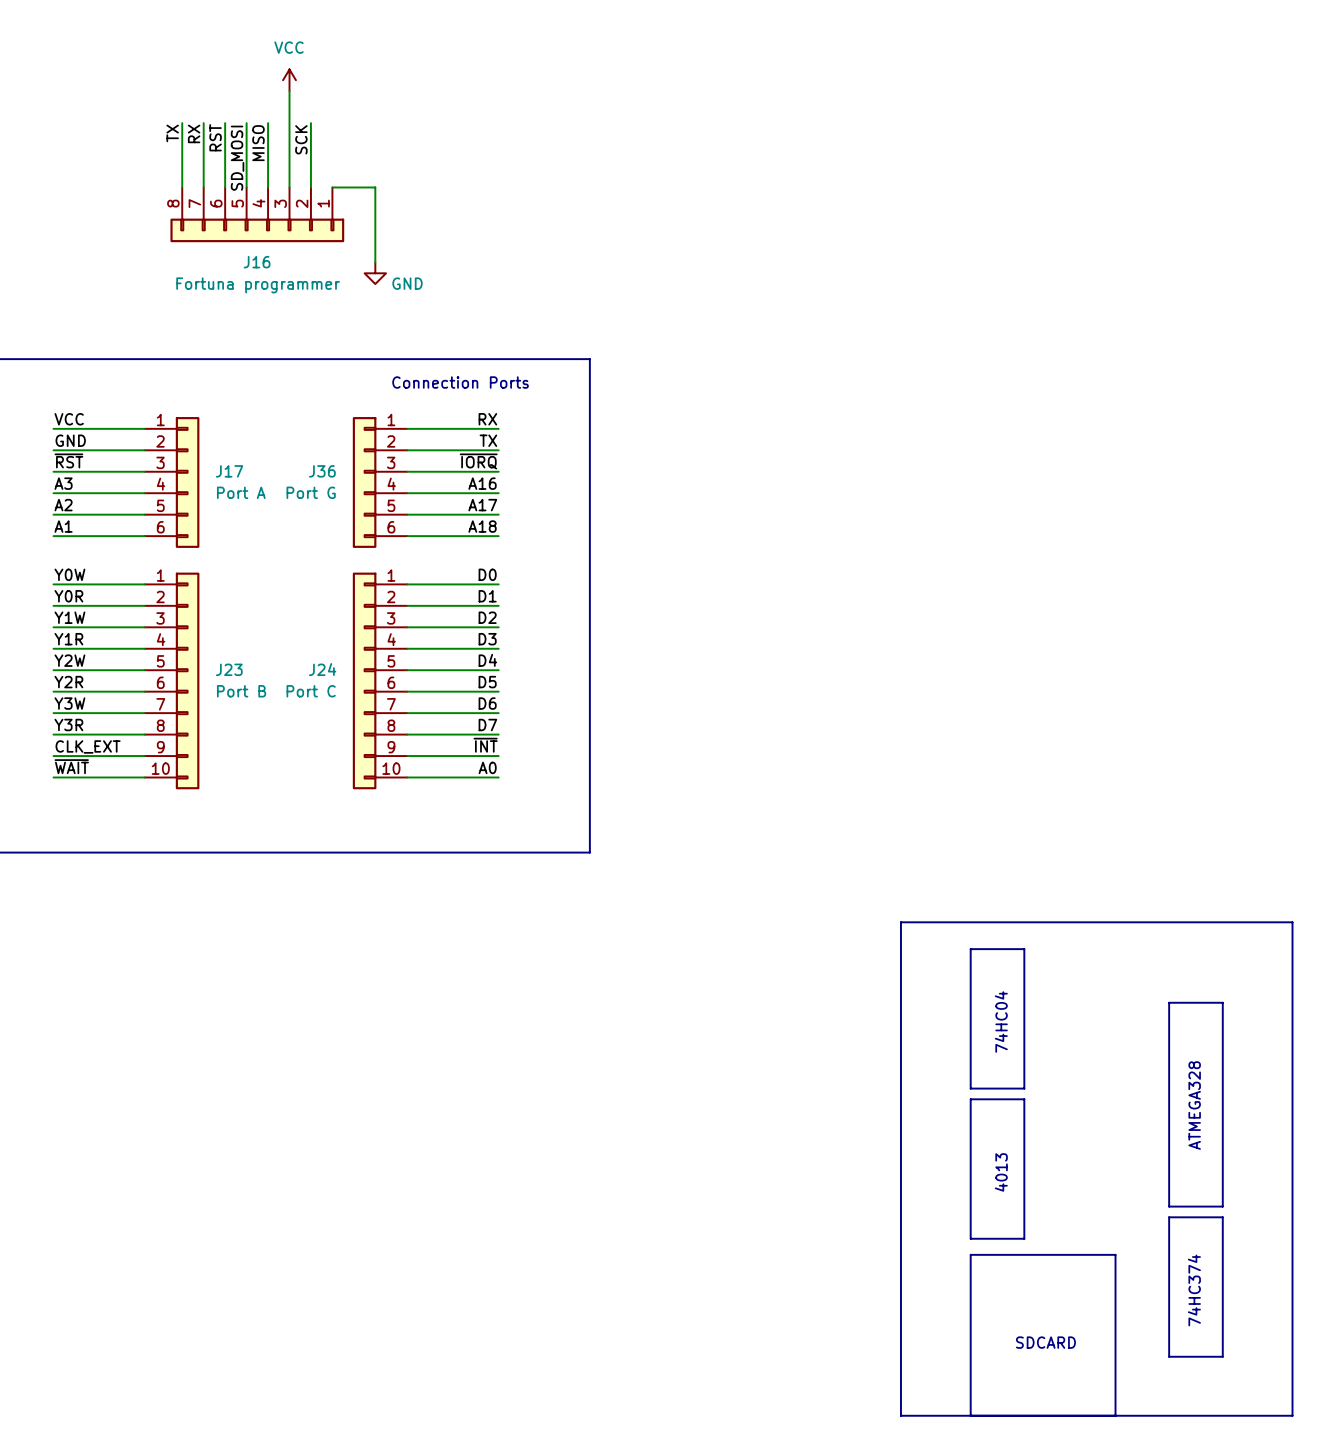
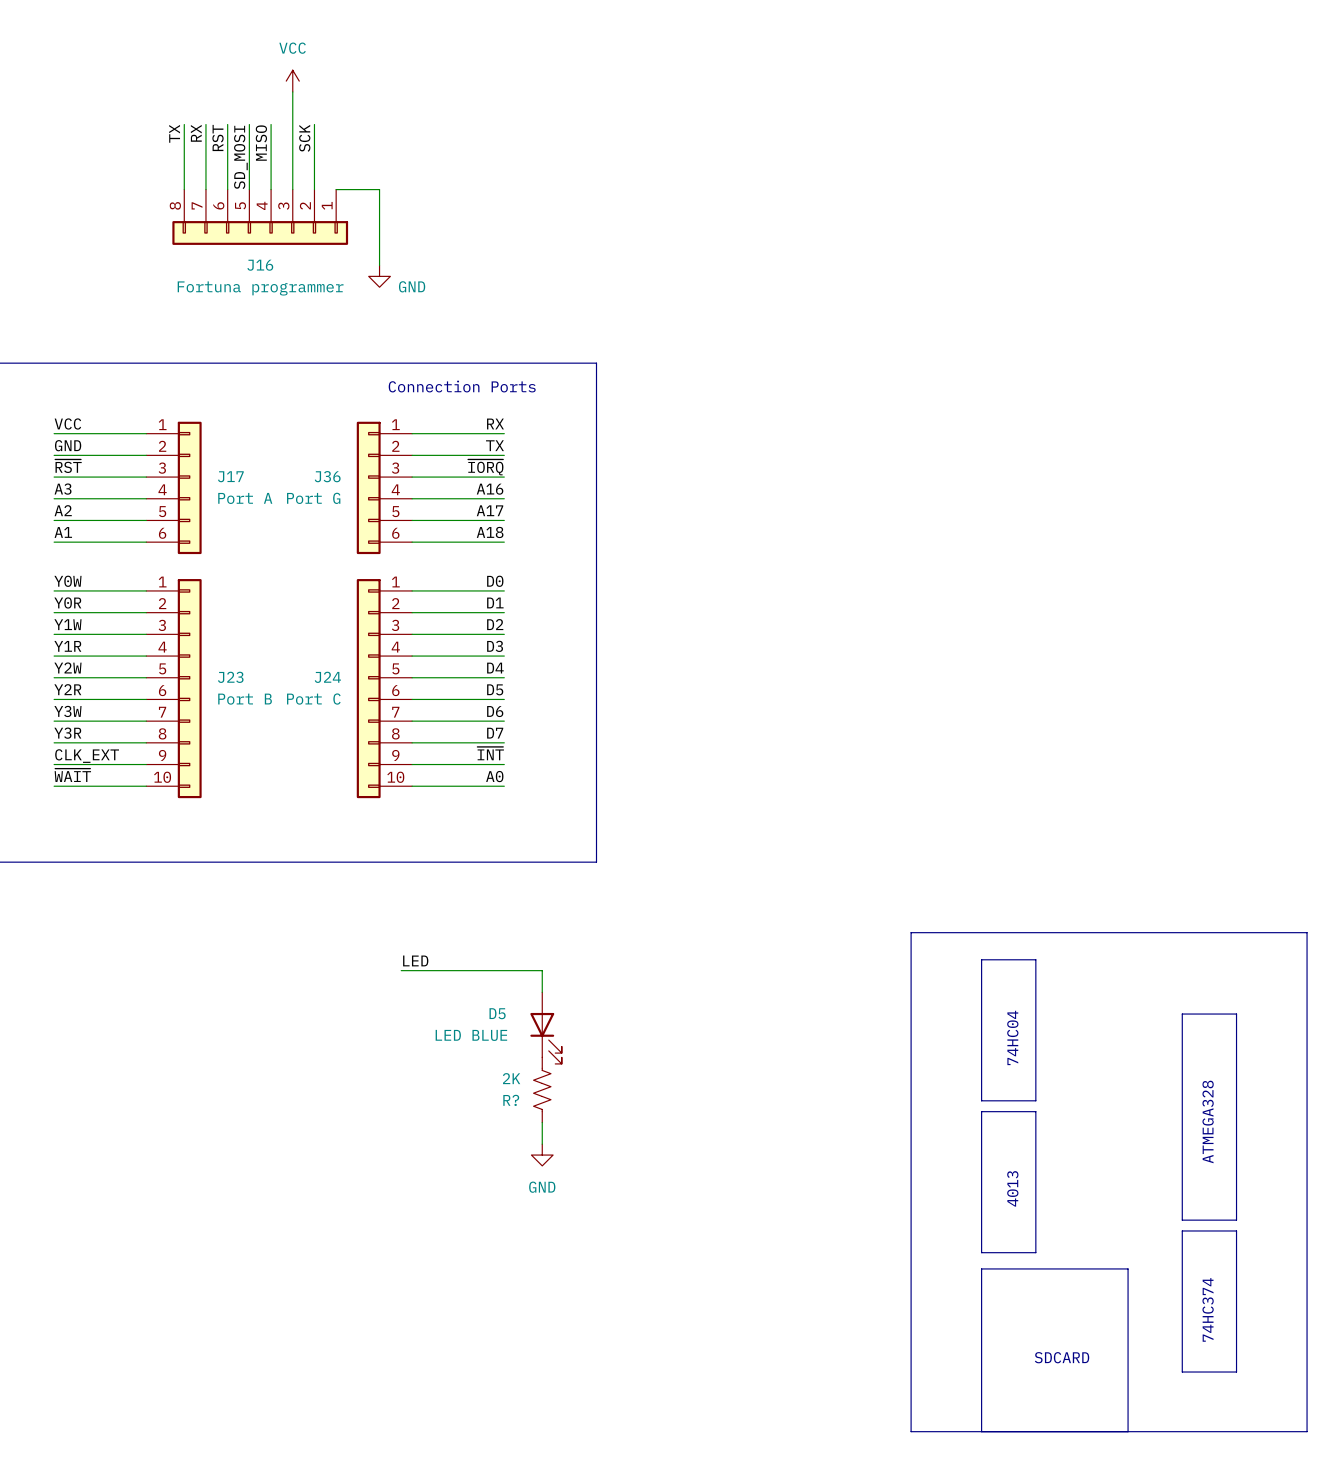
label: none -> LED (415, 960)
wire: none -> (401, 970) (542, 970) (542, 992)
D5: none -> LED BLUE (546, 1028)
R?: none -> 2K (542, 1089)
wire: none -> (542, 1122) (542, 1144)
power symbol: none -> GND (542, 1155)

